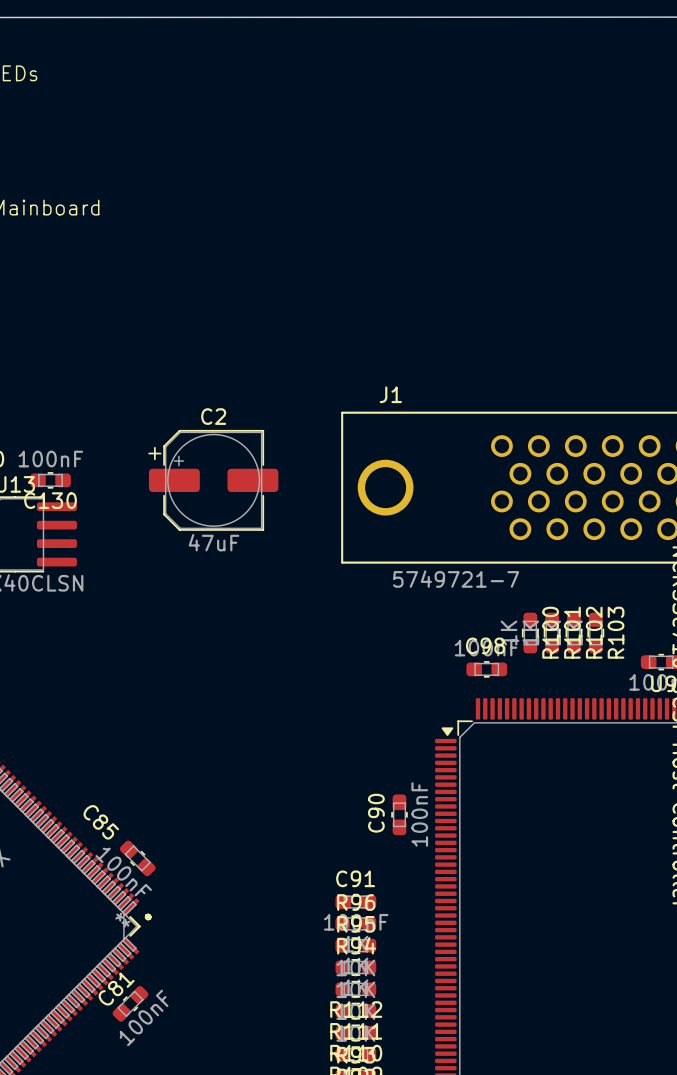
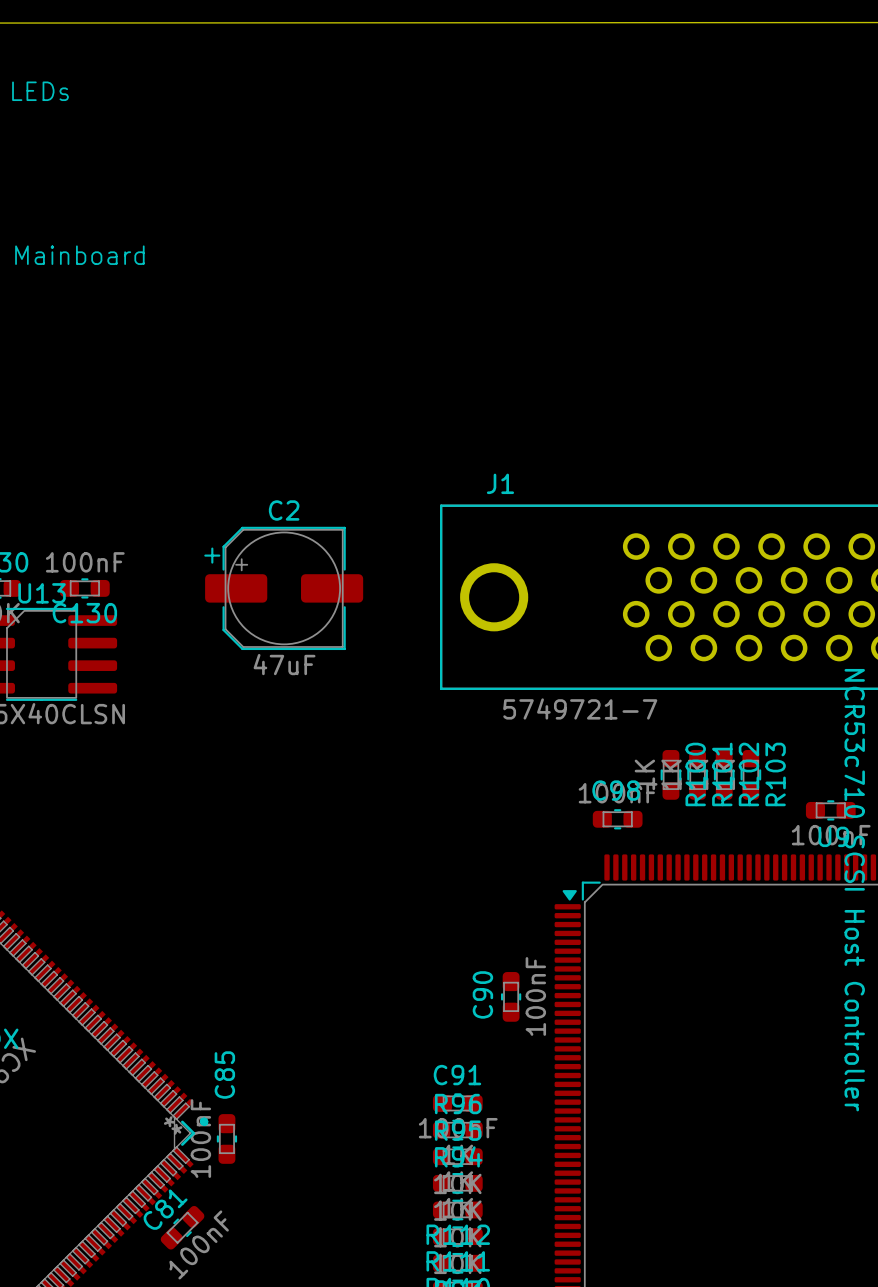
C85 rotation: 0° (137, 858) -> 45° clockwise (226, 1138)
C85 position: (137, 858) -> (226, 1138)

